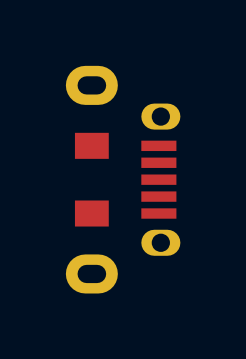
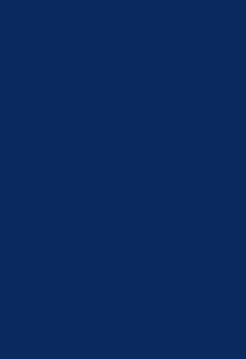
part: (123, 179) -> none

